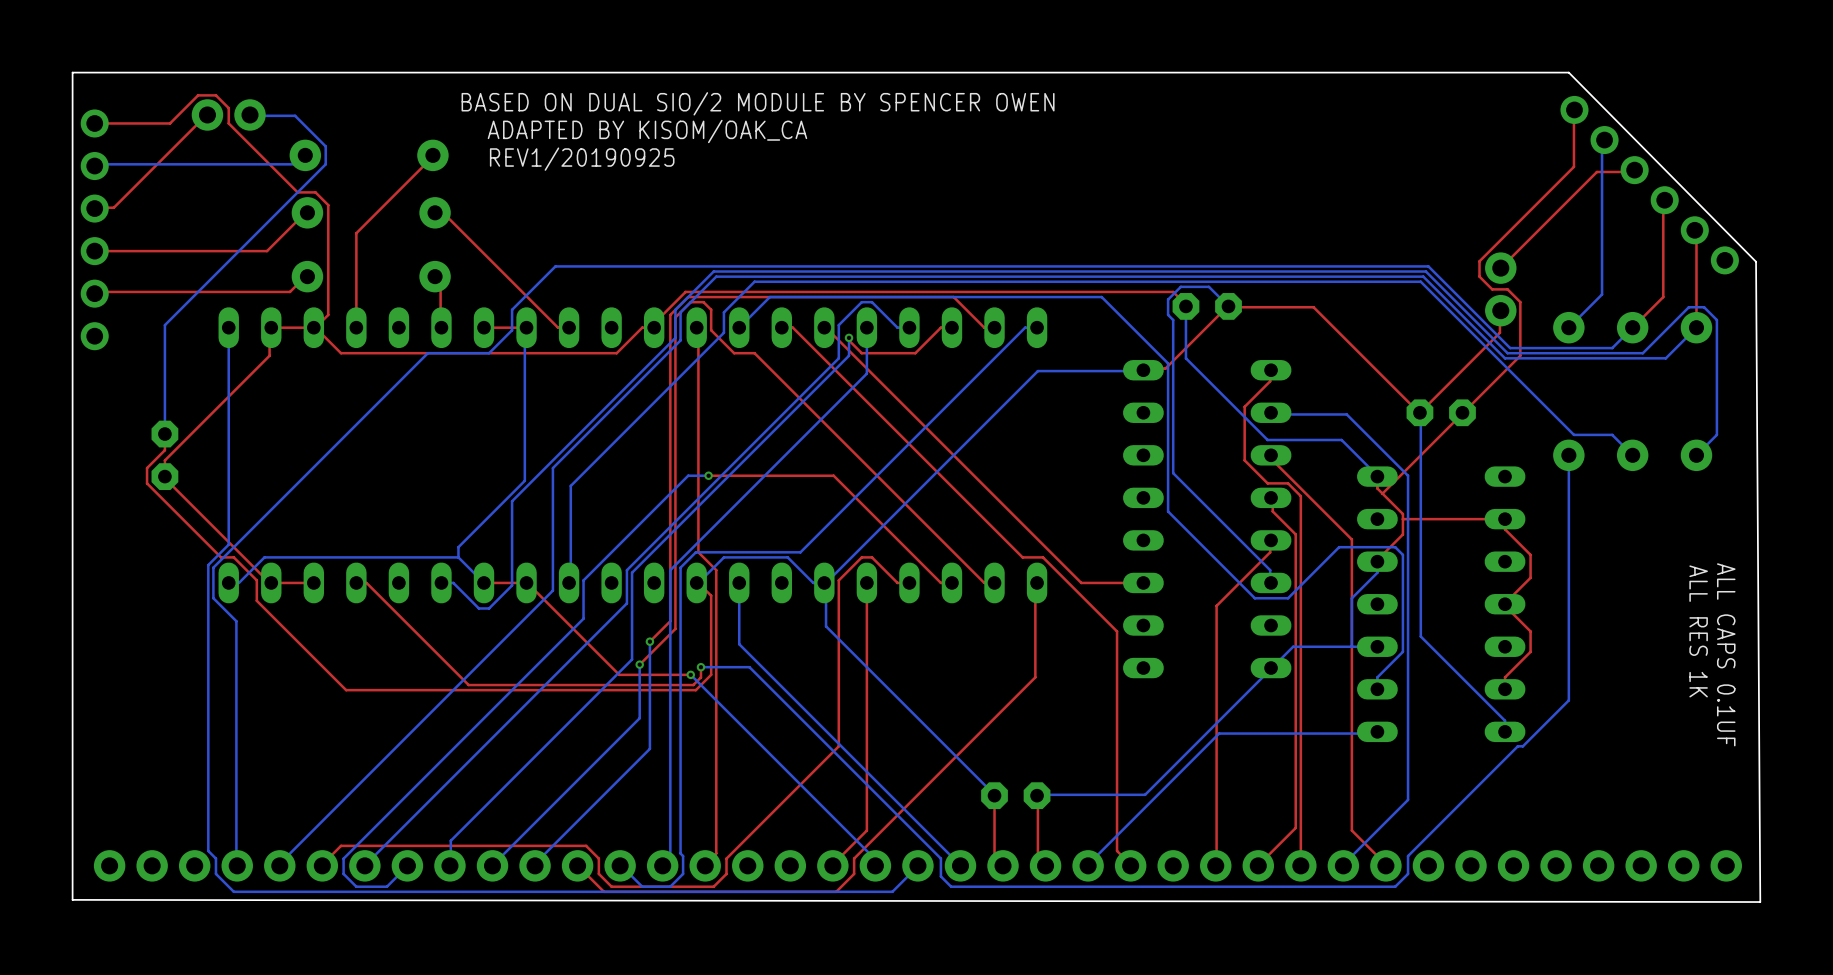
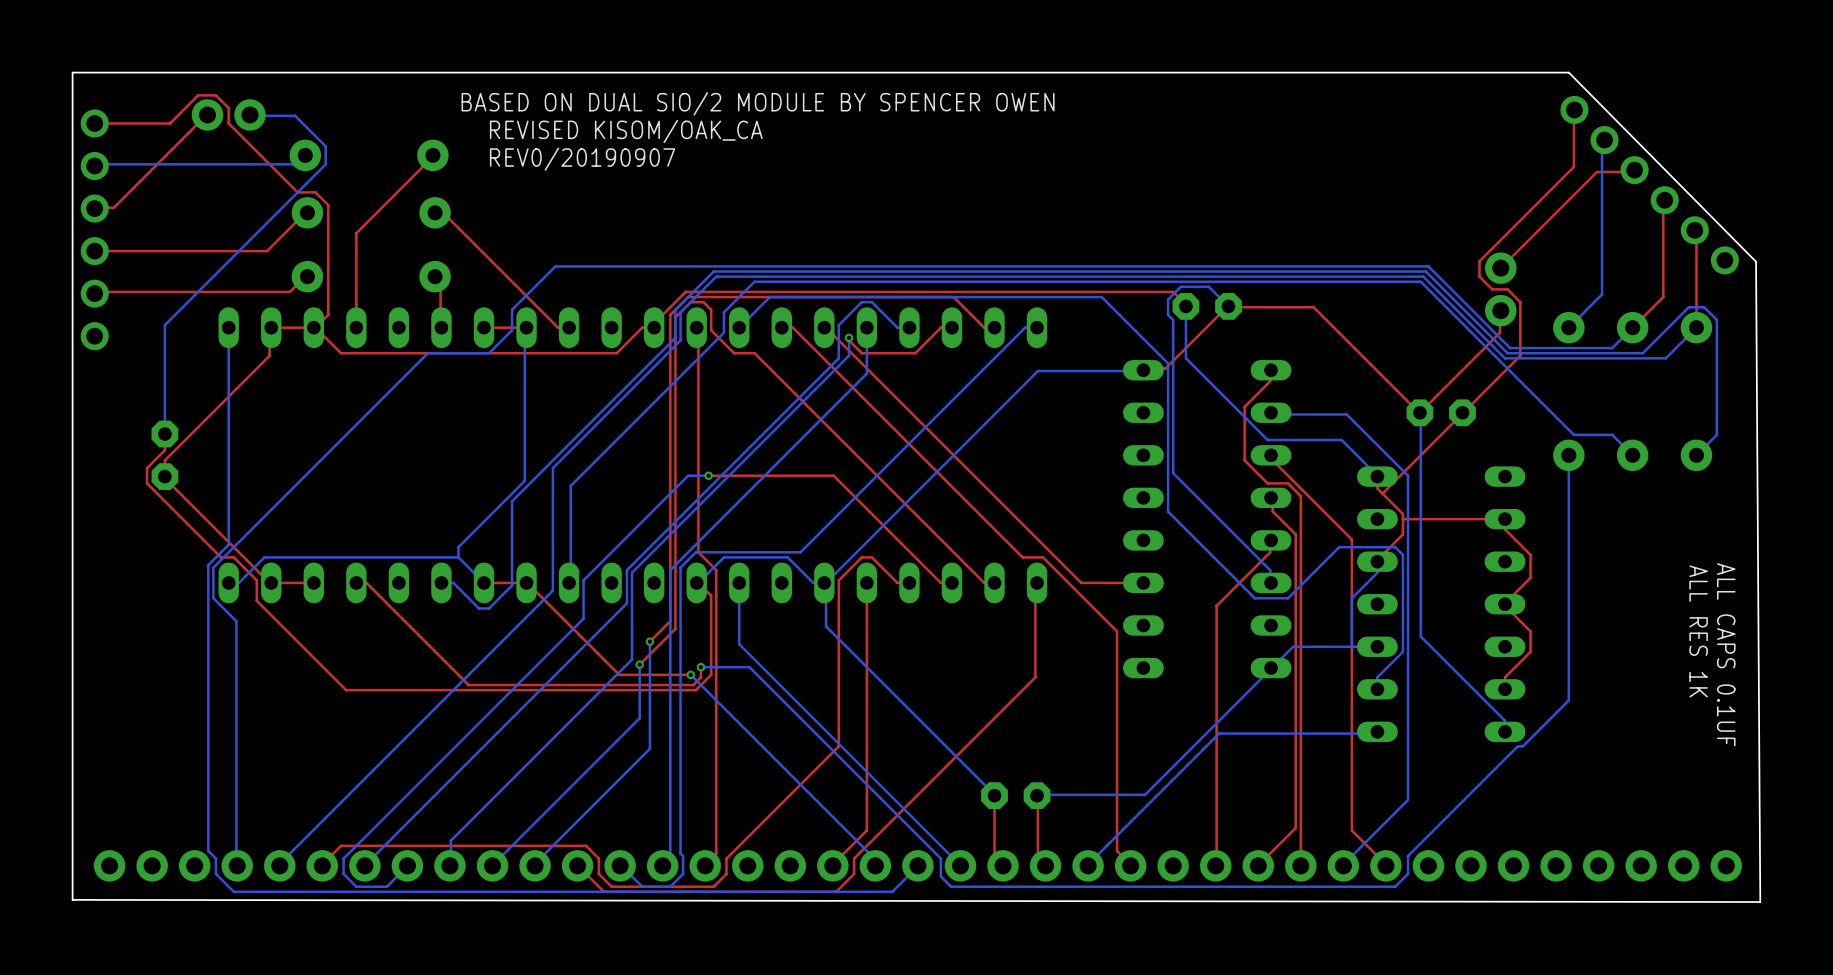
text: ADAPTED BY KISOM/OAK_CA (647, 131) -> REVISED KISOM/OAK_CA (626, 131)
text: REV1/20190925 (582, 159) -> REV0/20190907 (582, 159)

